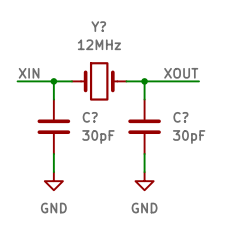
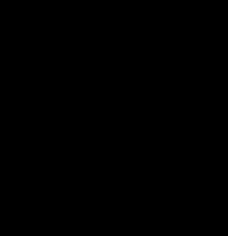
label: XIN (29, 73) -> none
label: XOUT (181, 73) -> none
wire: (17, 81) (72, 81) -> none
wire: (53, 81) (53, 99) -> none
junction: (53, 81) -> none
Y?: 12MHz (99, 81) -> none
wire: (126, 81) (199, 81) -> none
wire: (144, 81) (144, 99) -> none
junction: (144, 81) -> none
C?: 30pF (53, 126) -> none
C?: 30pF (144, 126) -> none
wire: (53, 153) (53, 172) -> none
wire: (144, 153) (144, 172) -> none
power symbol: GND (53, 181) -> none
power symbol: GND (144, 181) -> none

